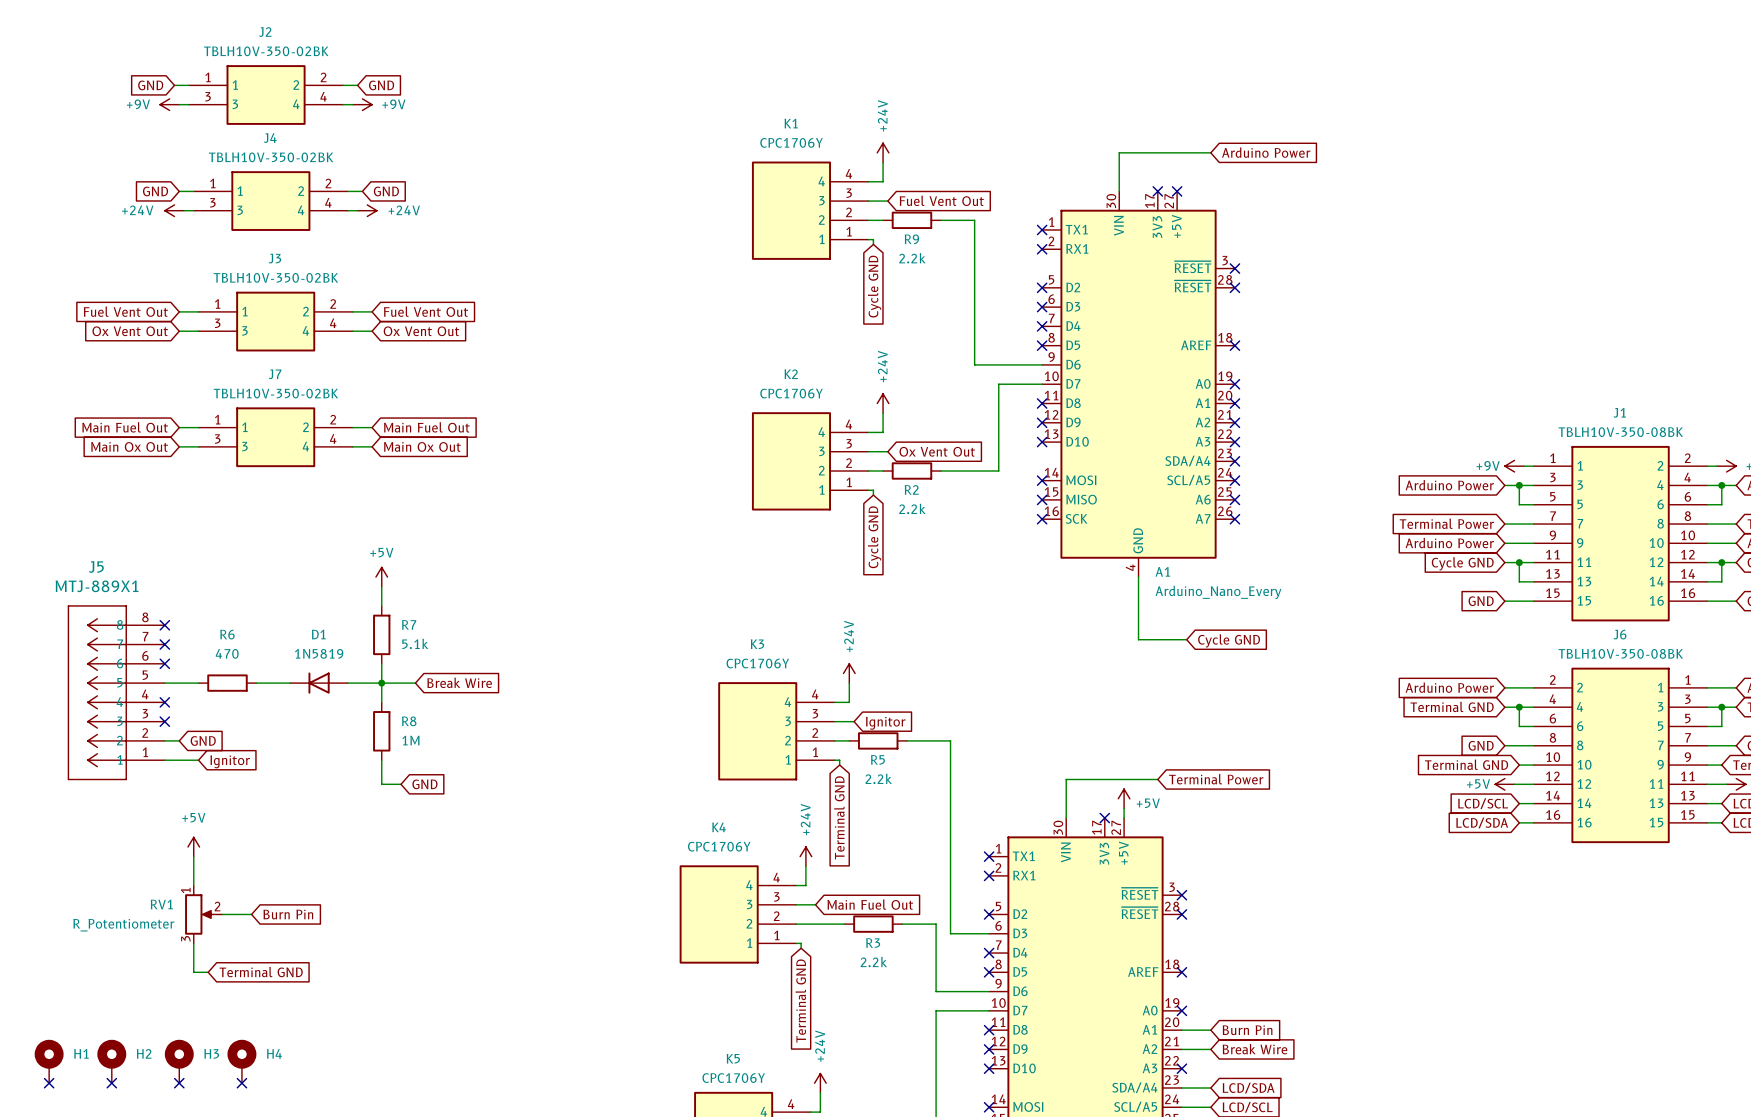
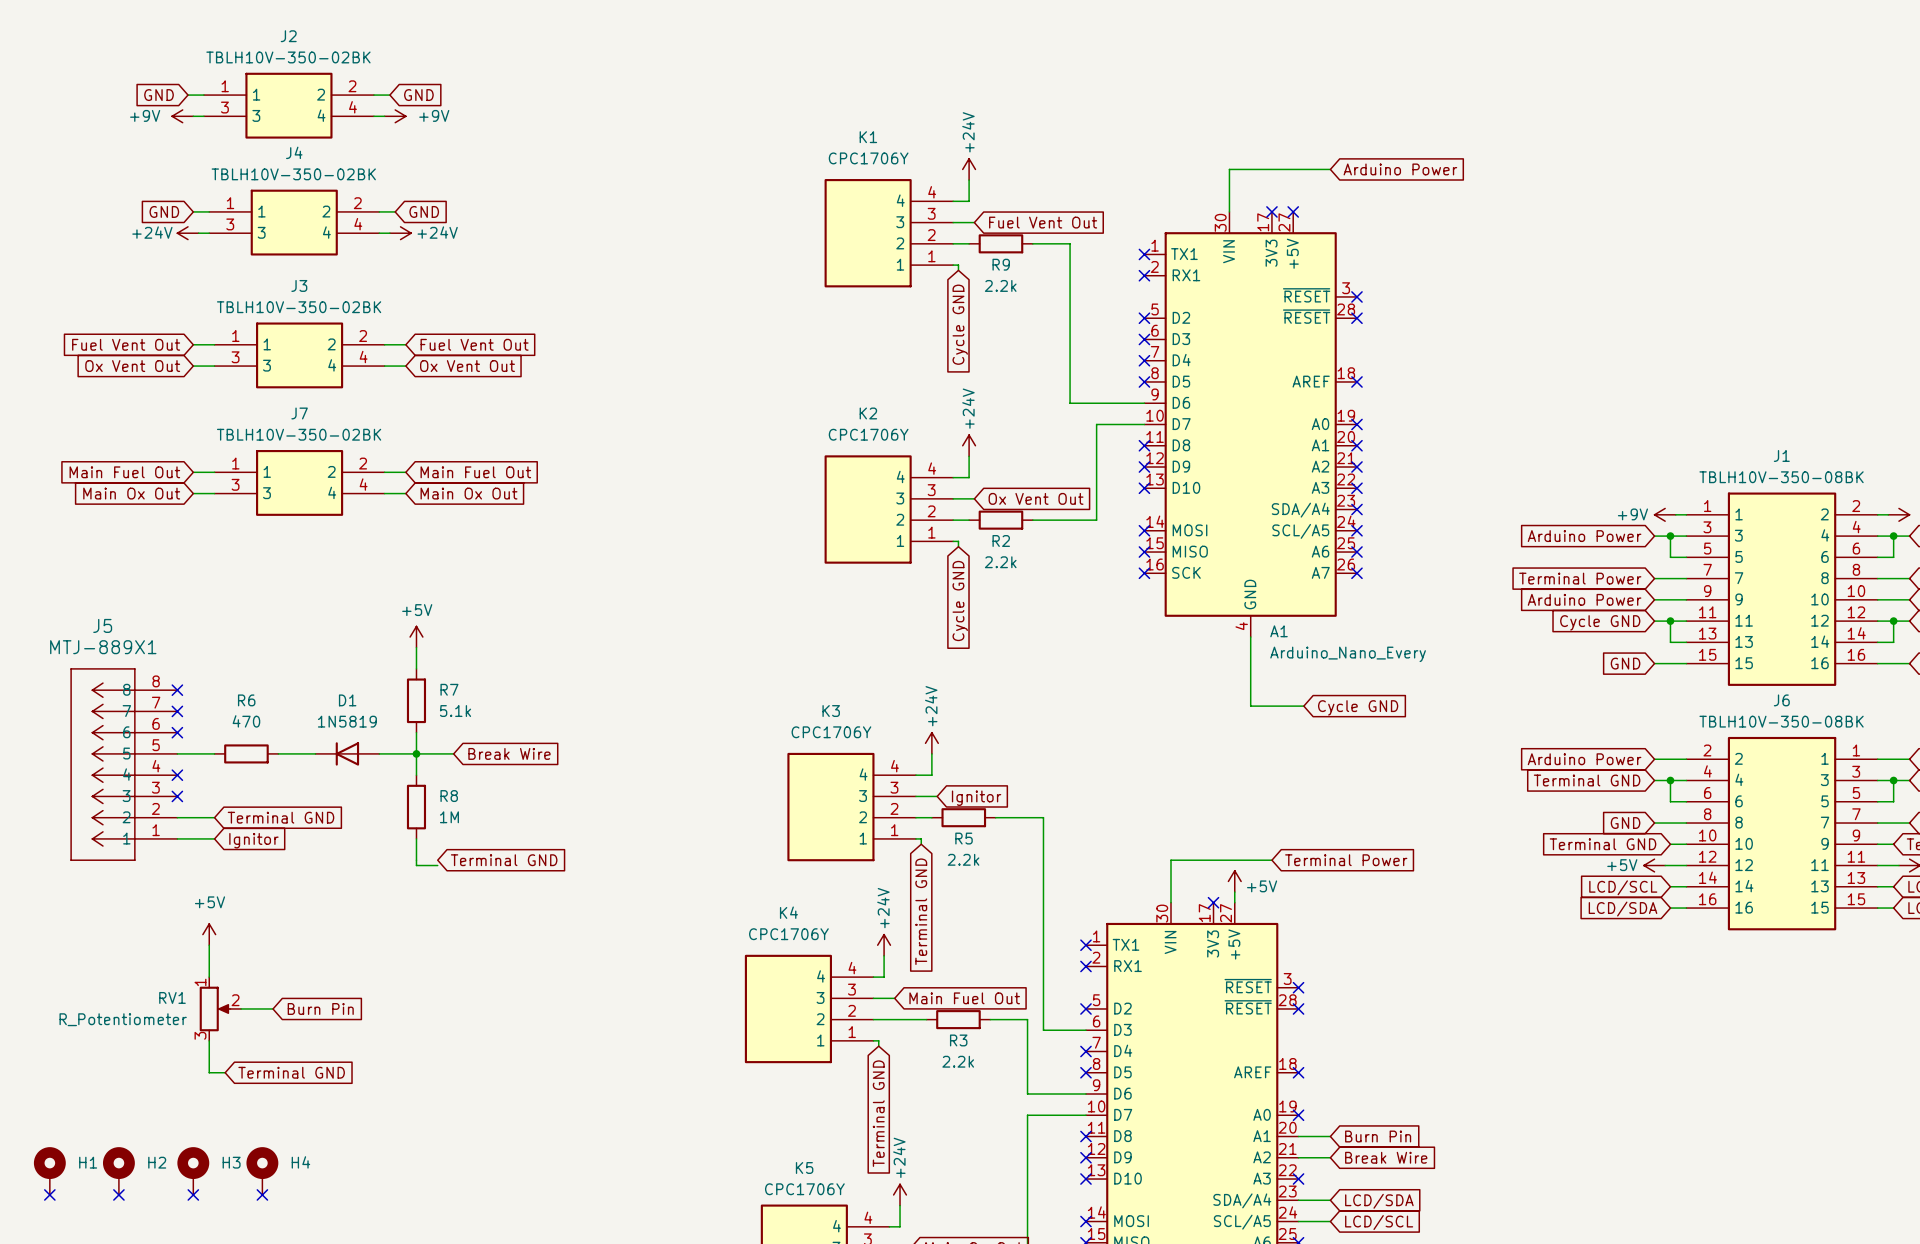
wire: none -> (193, 817) (214, 817)
global label: GND (203, 740) -> none
global label: none -> Terminal GND (281, 817)
global label: GND (424, 784) -> Terminal GND (504, 860)

